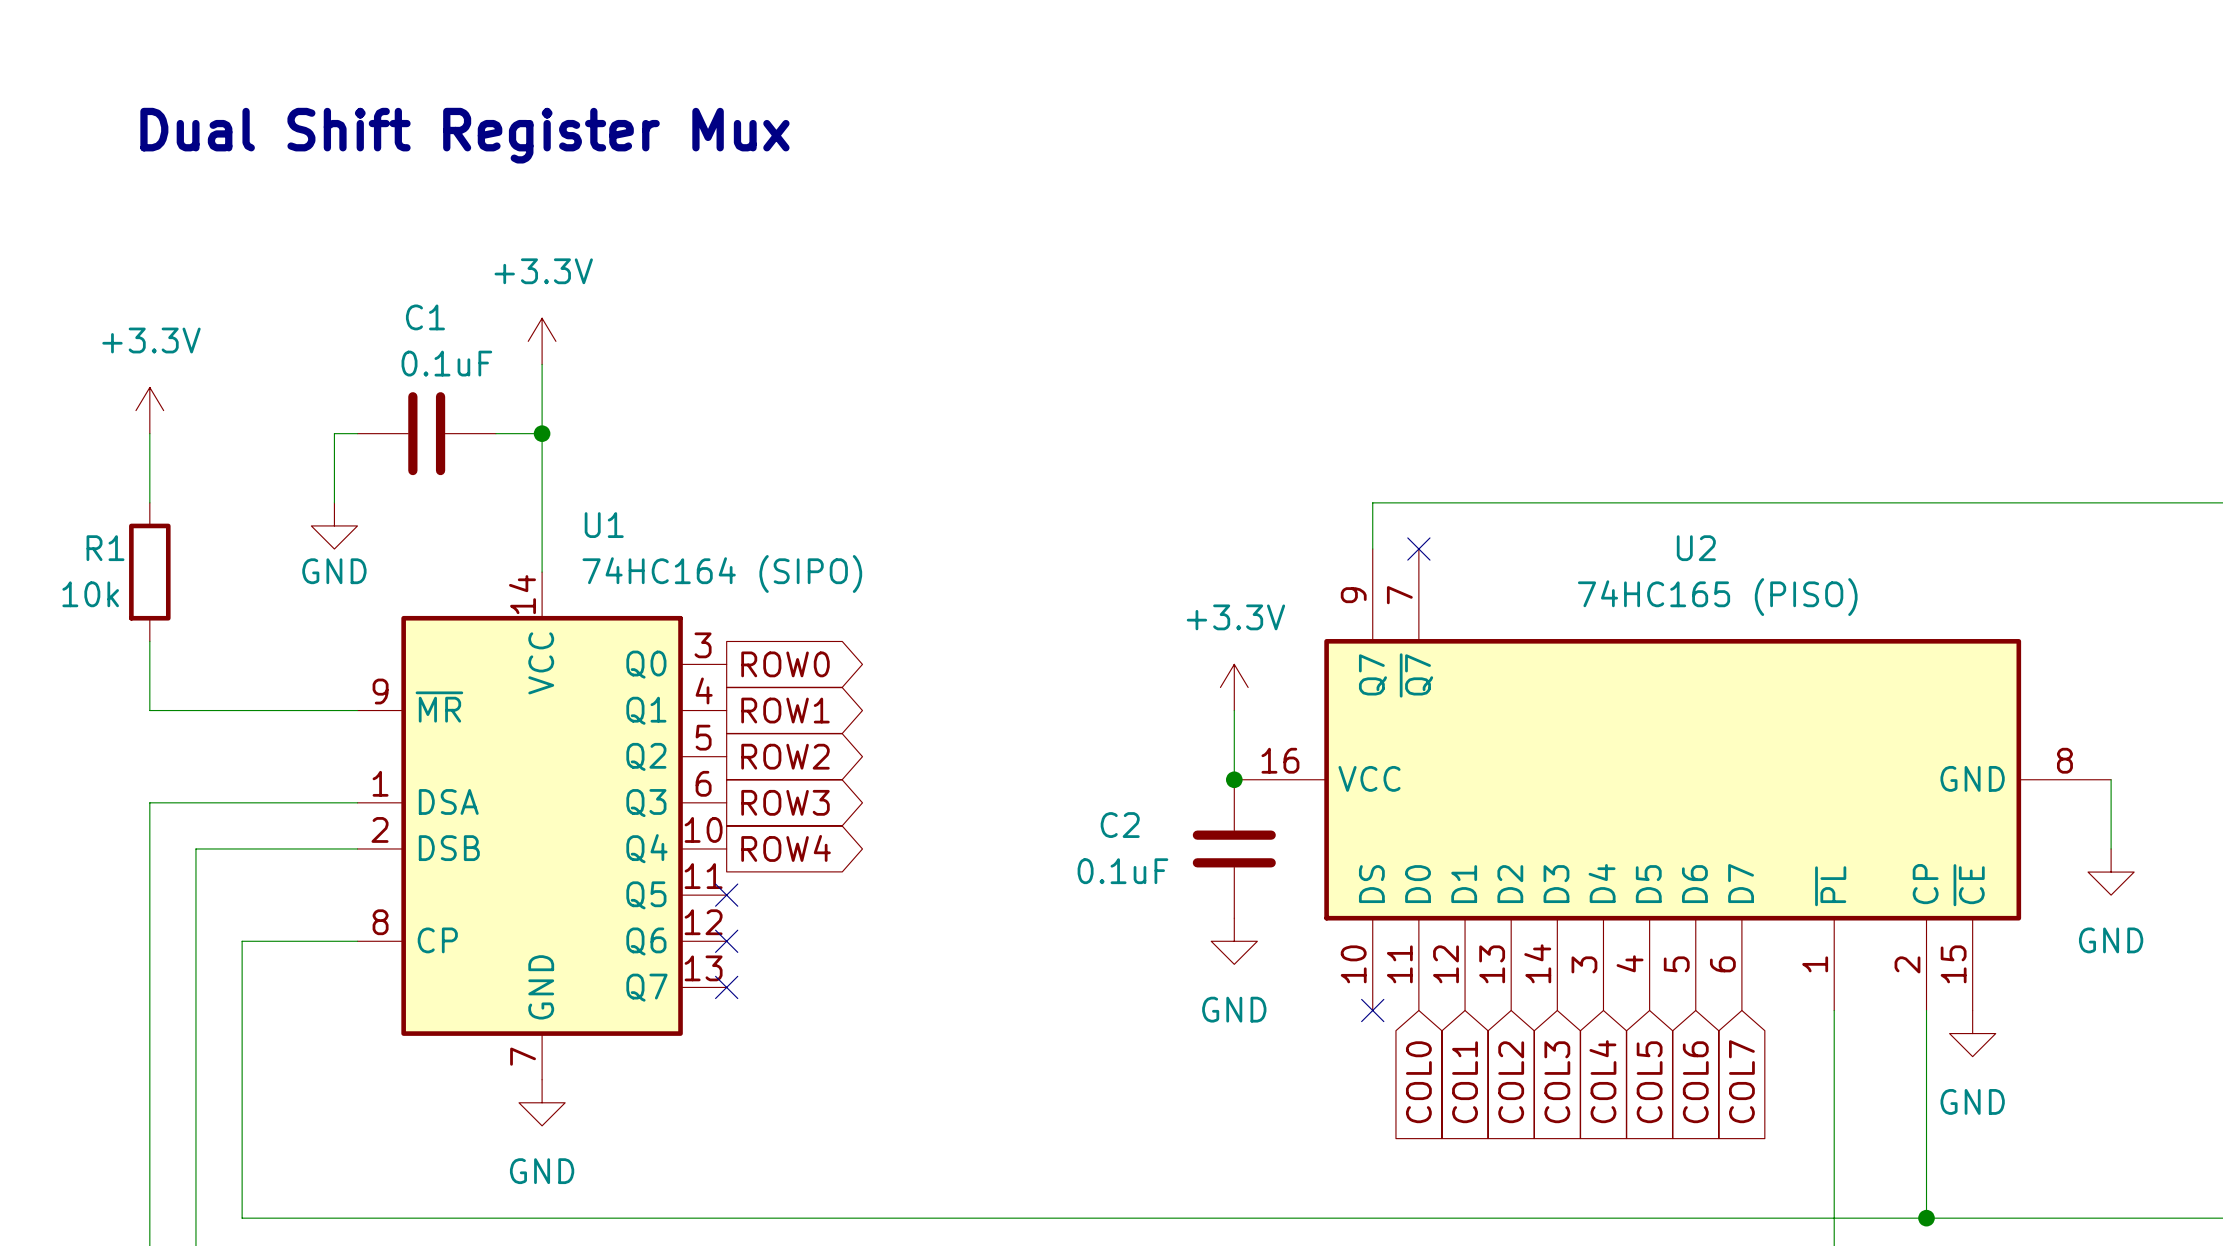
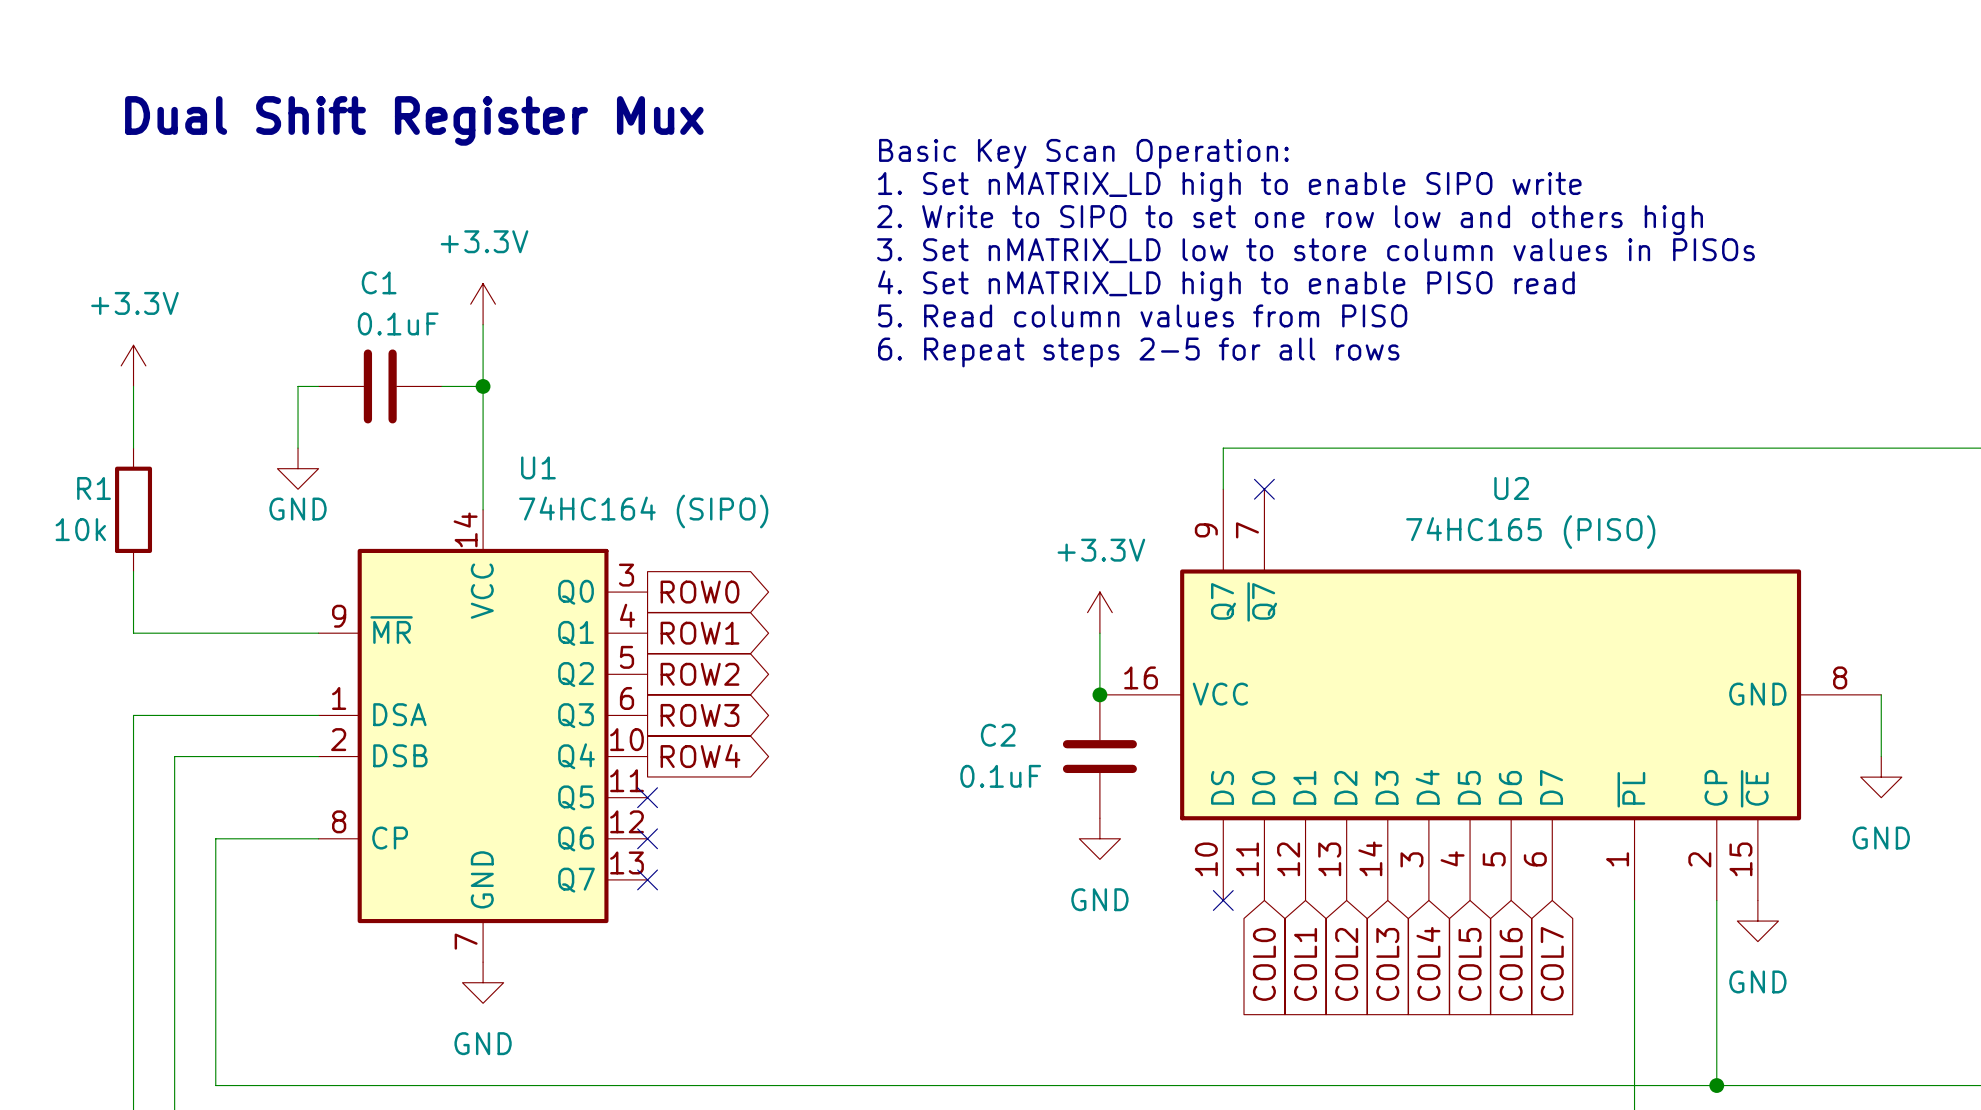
text: none -> Basic Key Scan Operation: (1083, 153)
text: none -> 1. Set nMATRIX_LD high to enable SIPO write (1229, 186)
text: none -> 2. Write to SIPO to set one row low and others high (1290, 220)
text: none -> 3. Set nMATRIX_LD low to store column values in PISOs (1315, 250)
text: none -> 4. Set nMATRIX_LD high to enable PISO read (1226, 285)
text: none -> 5. Read column values from PISO (1142, 315)
text: none -> 6. Repeat steps 2-5 for all rows (1138, 352)

